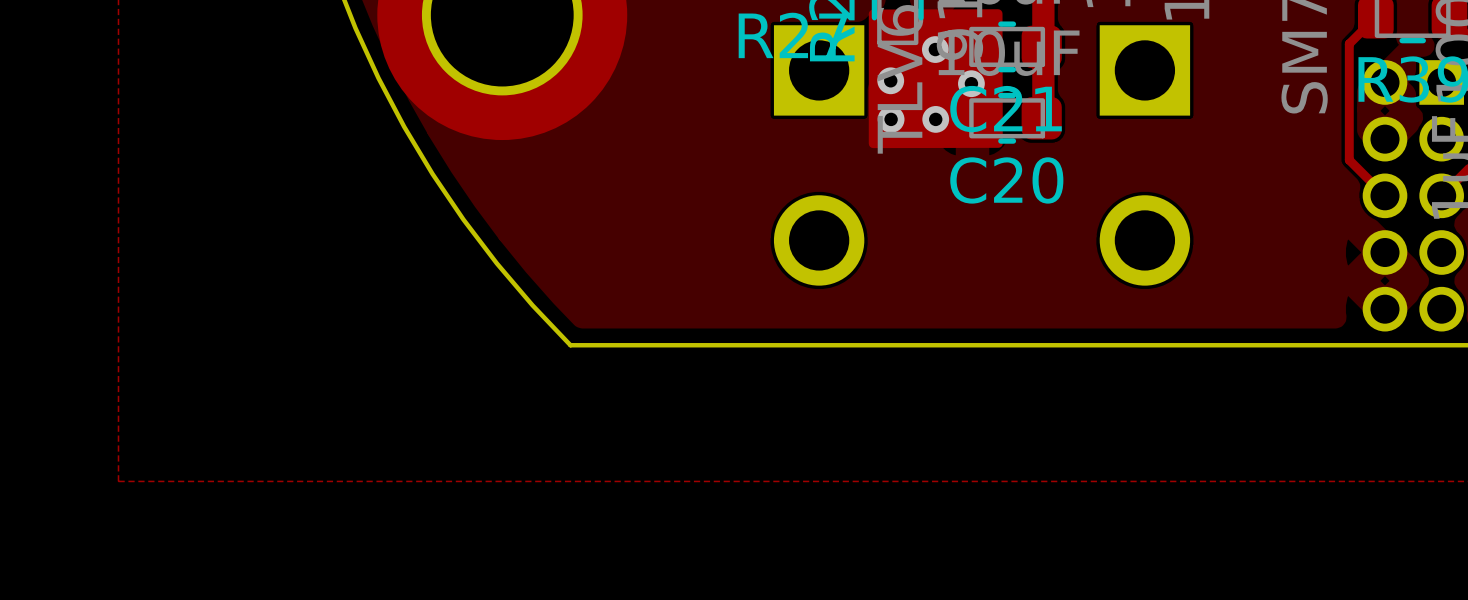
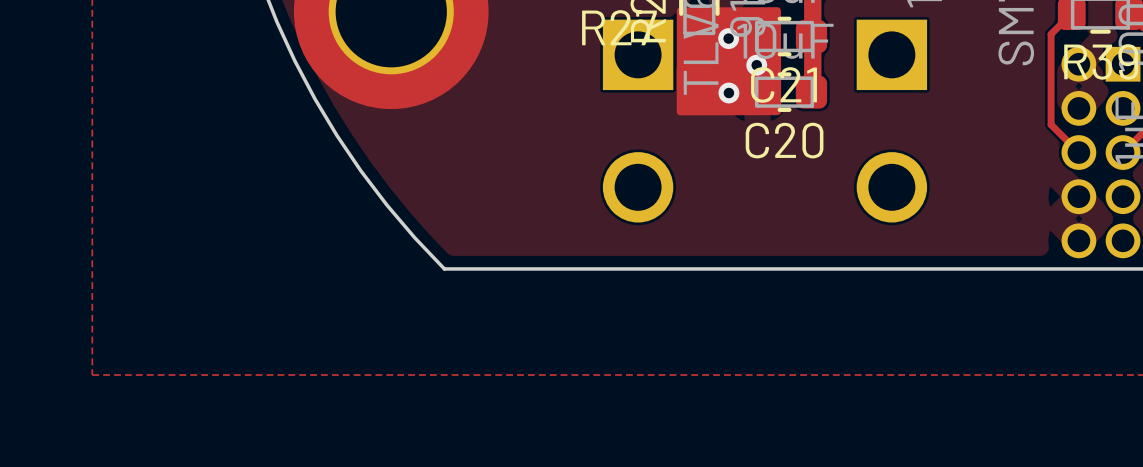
via: (890, 80) -> none
via: (891, 119) -> none

